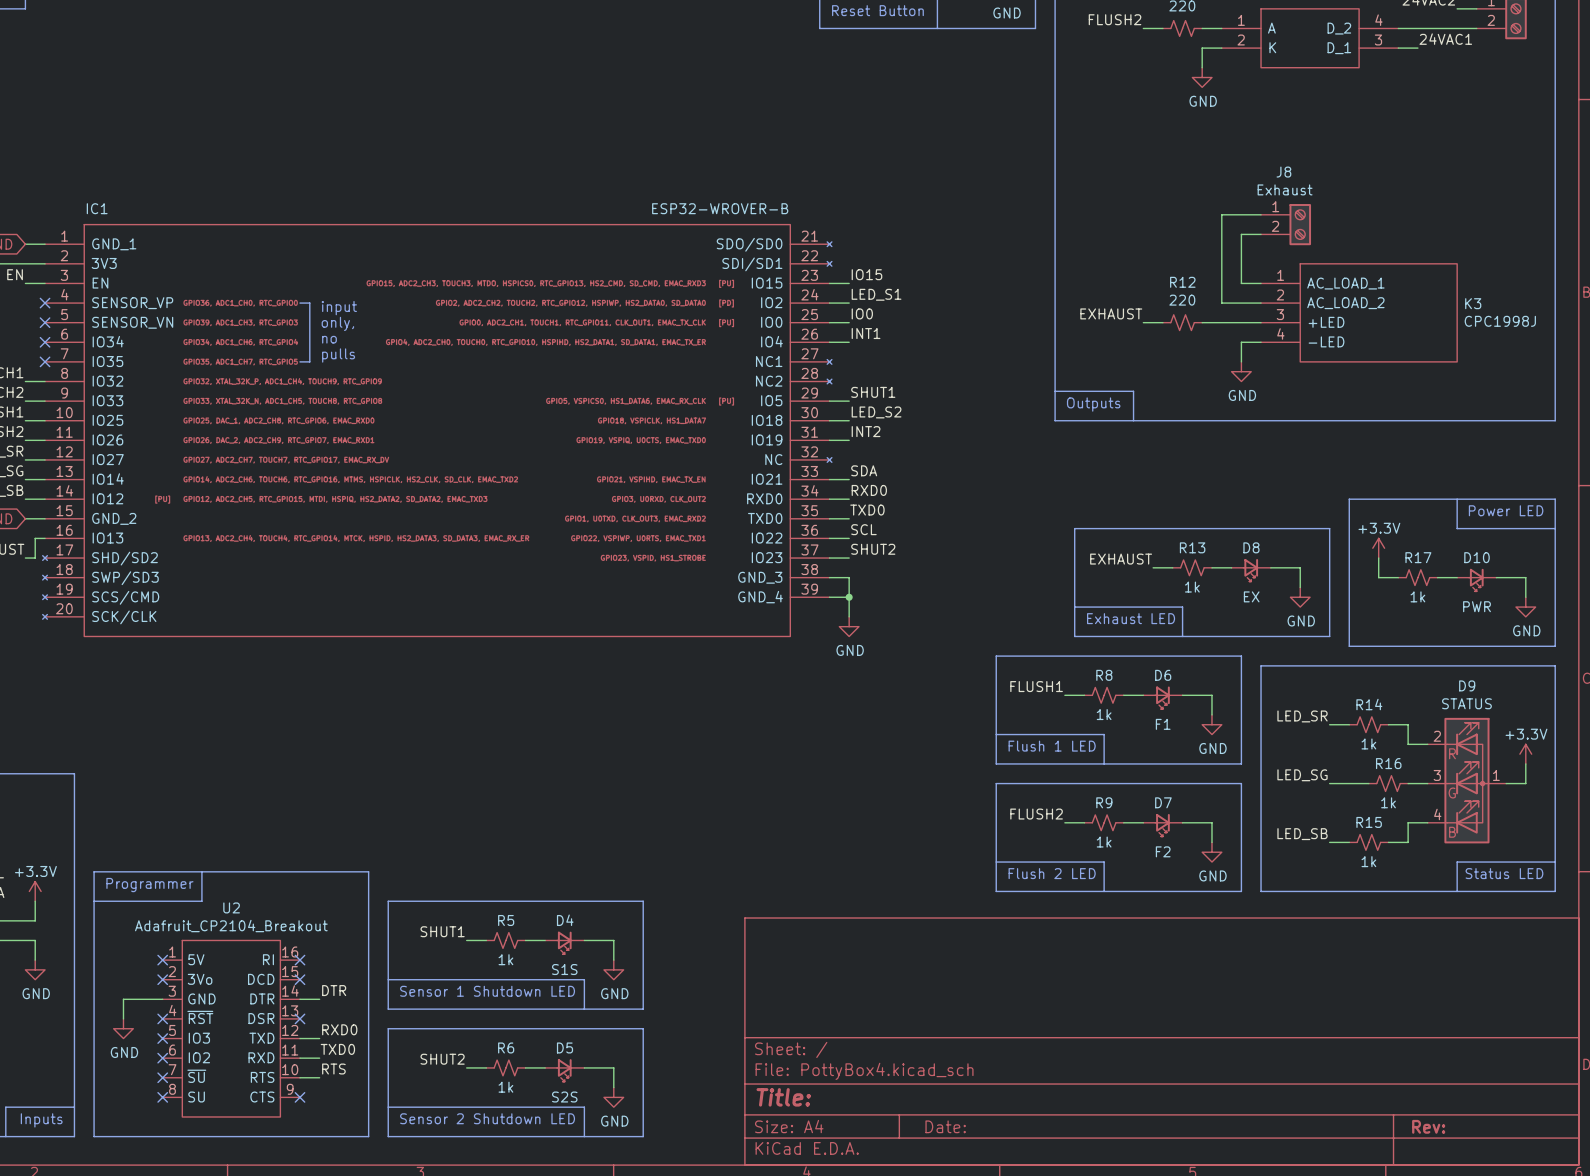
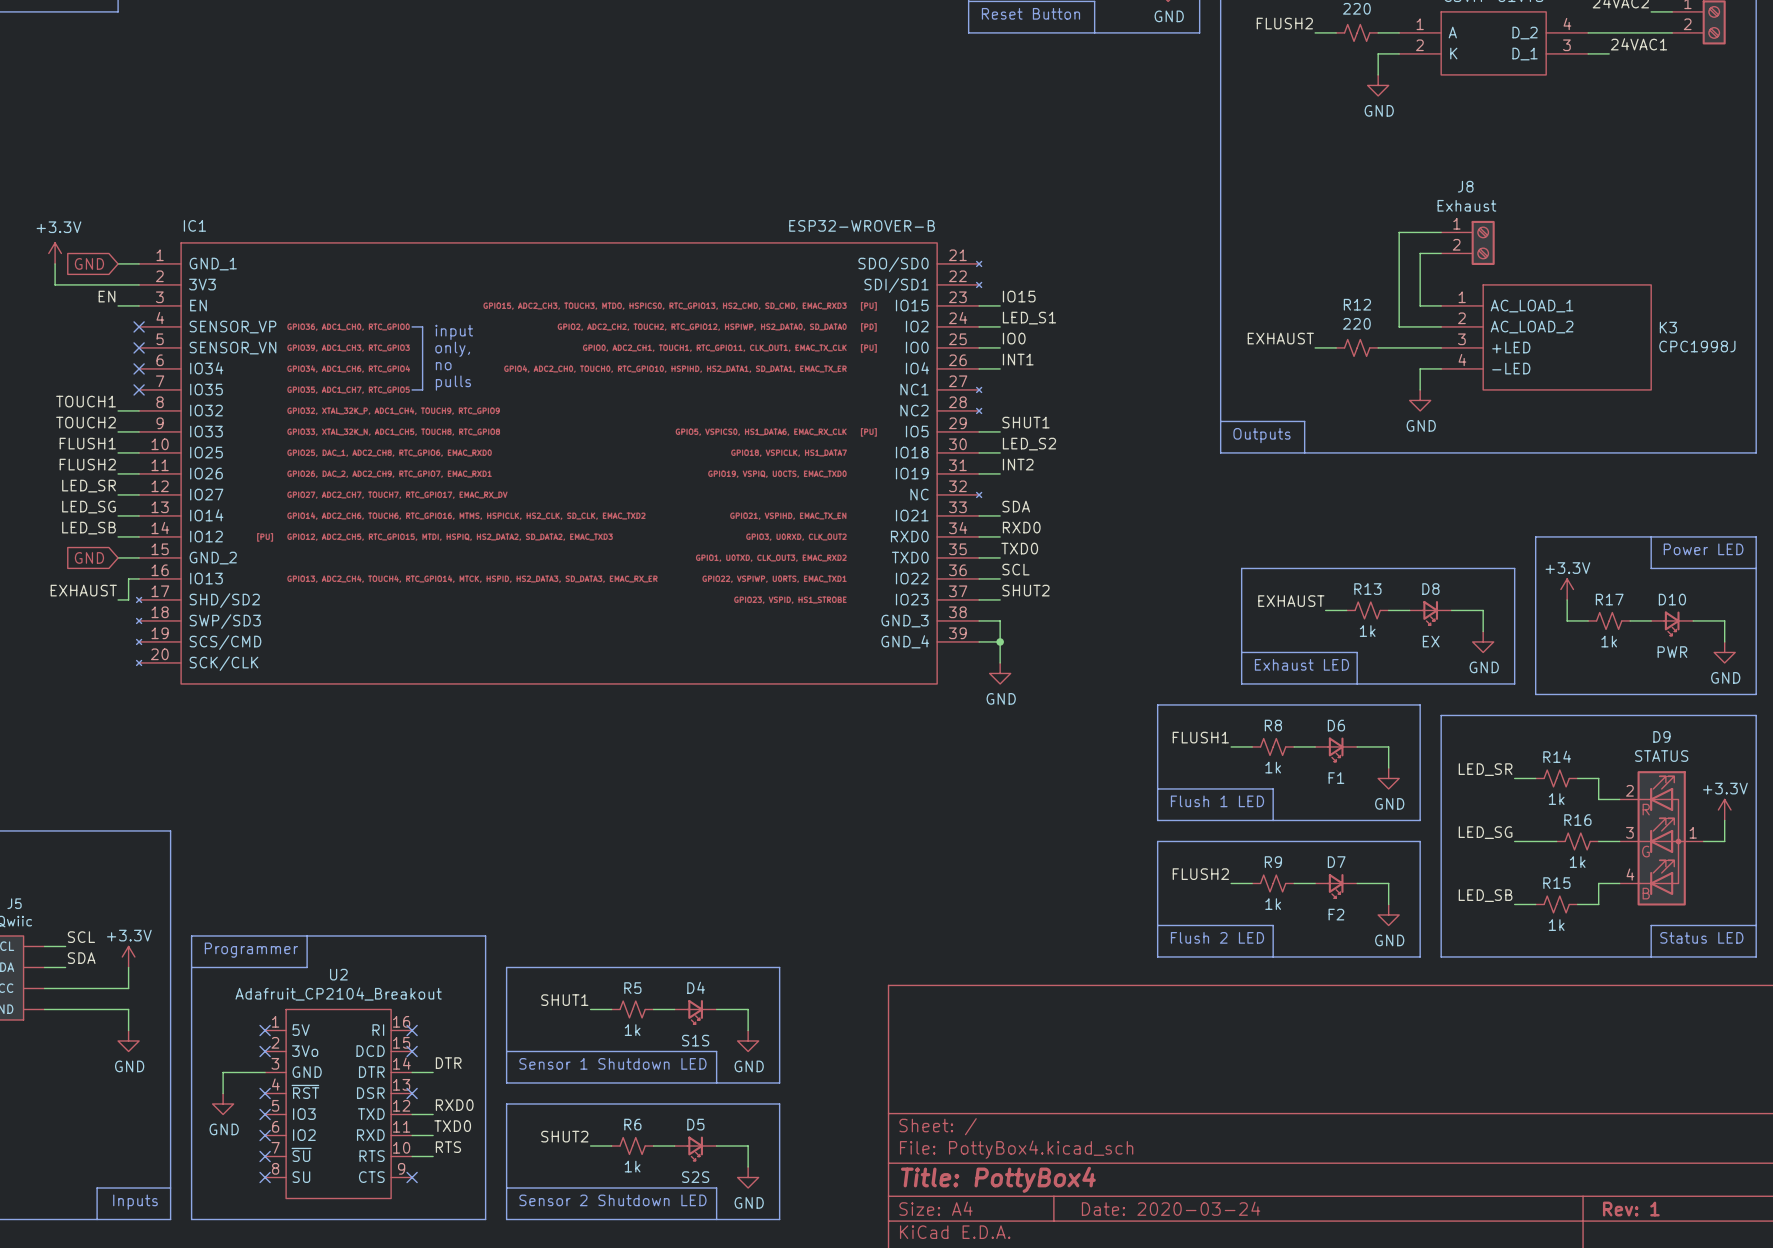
title block: Title: (783, 1097) -> Title: PottyBox4 (998, 1179)
title block: Date: (945, 1126) -> Date: 2020-03-24 (1171, 1208)
title block: Rev: (1428, 1126) -> Rev: 1 (1631, 1209)

